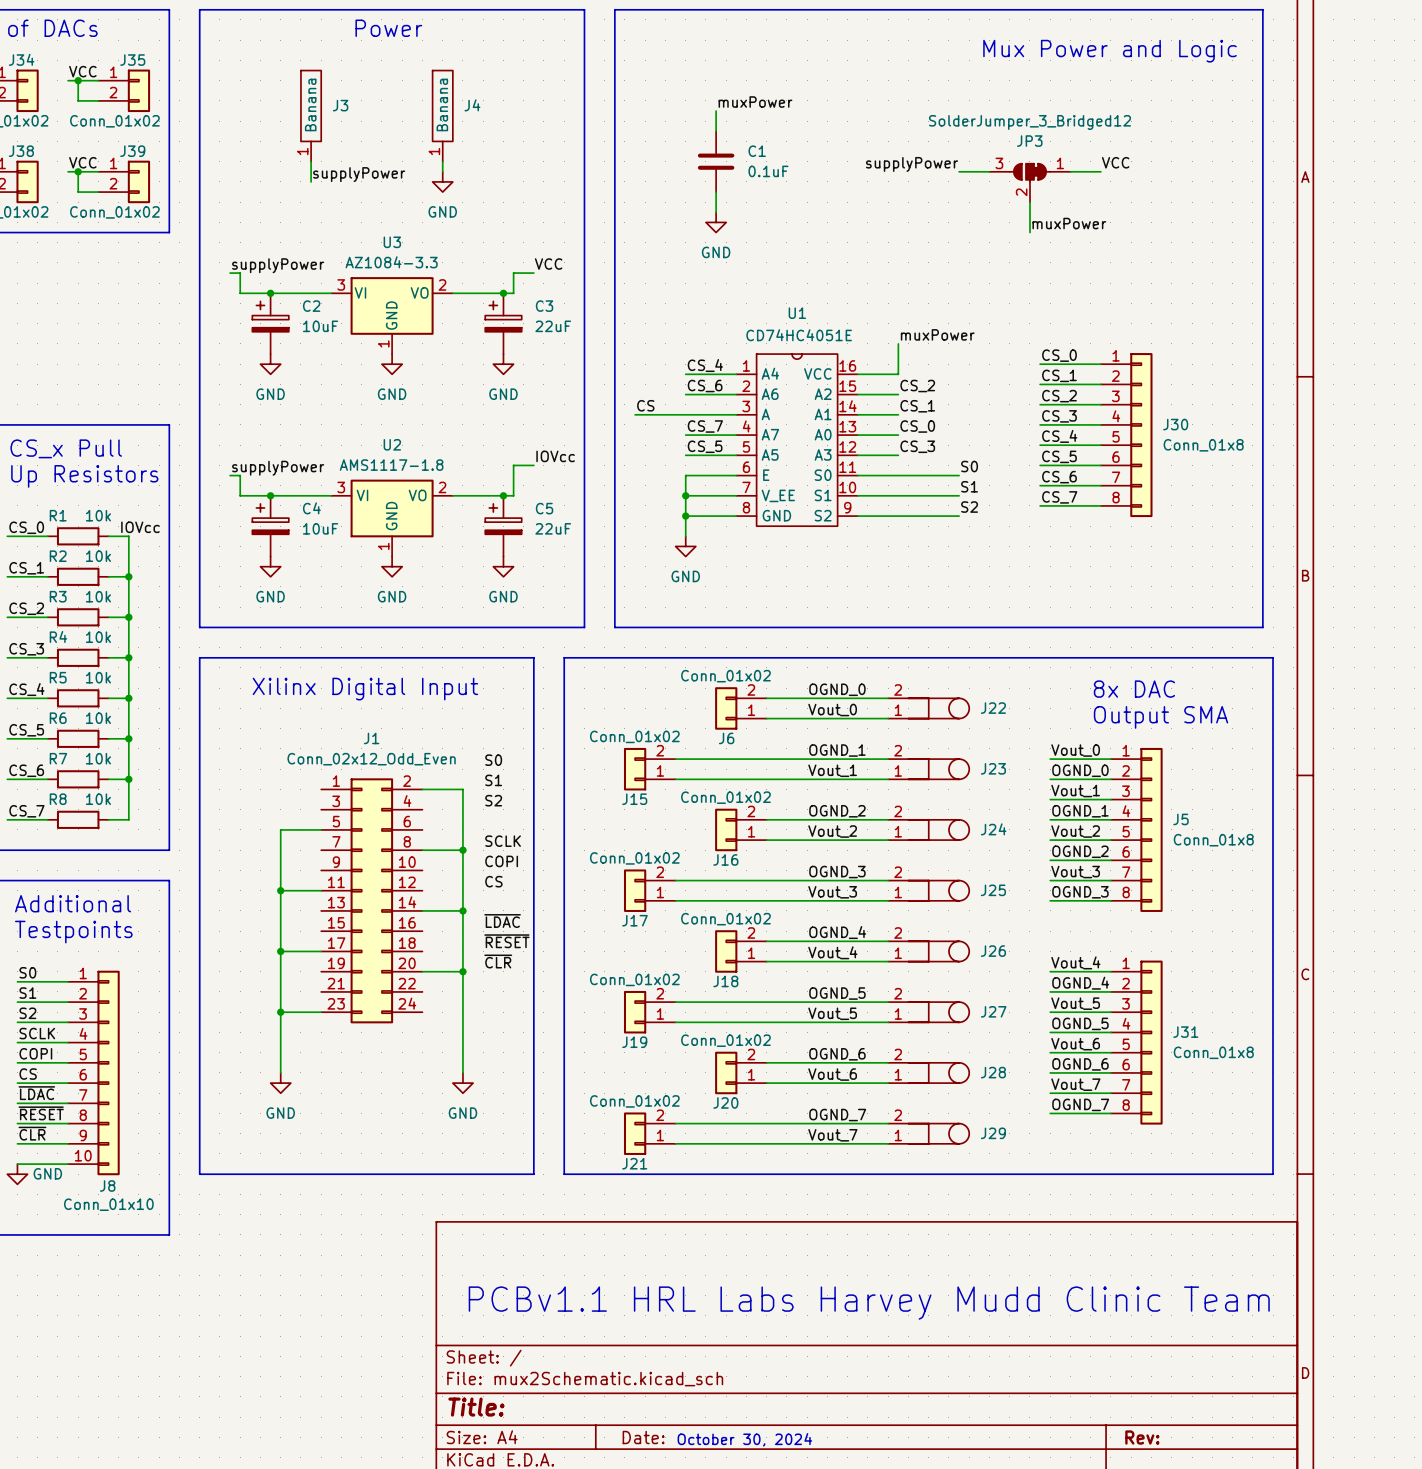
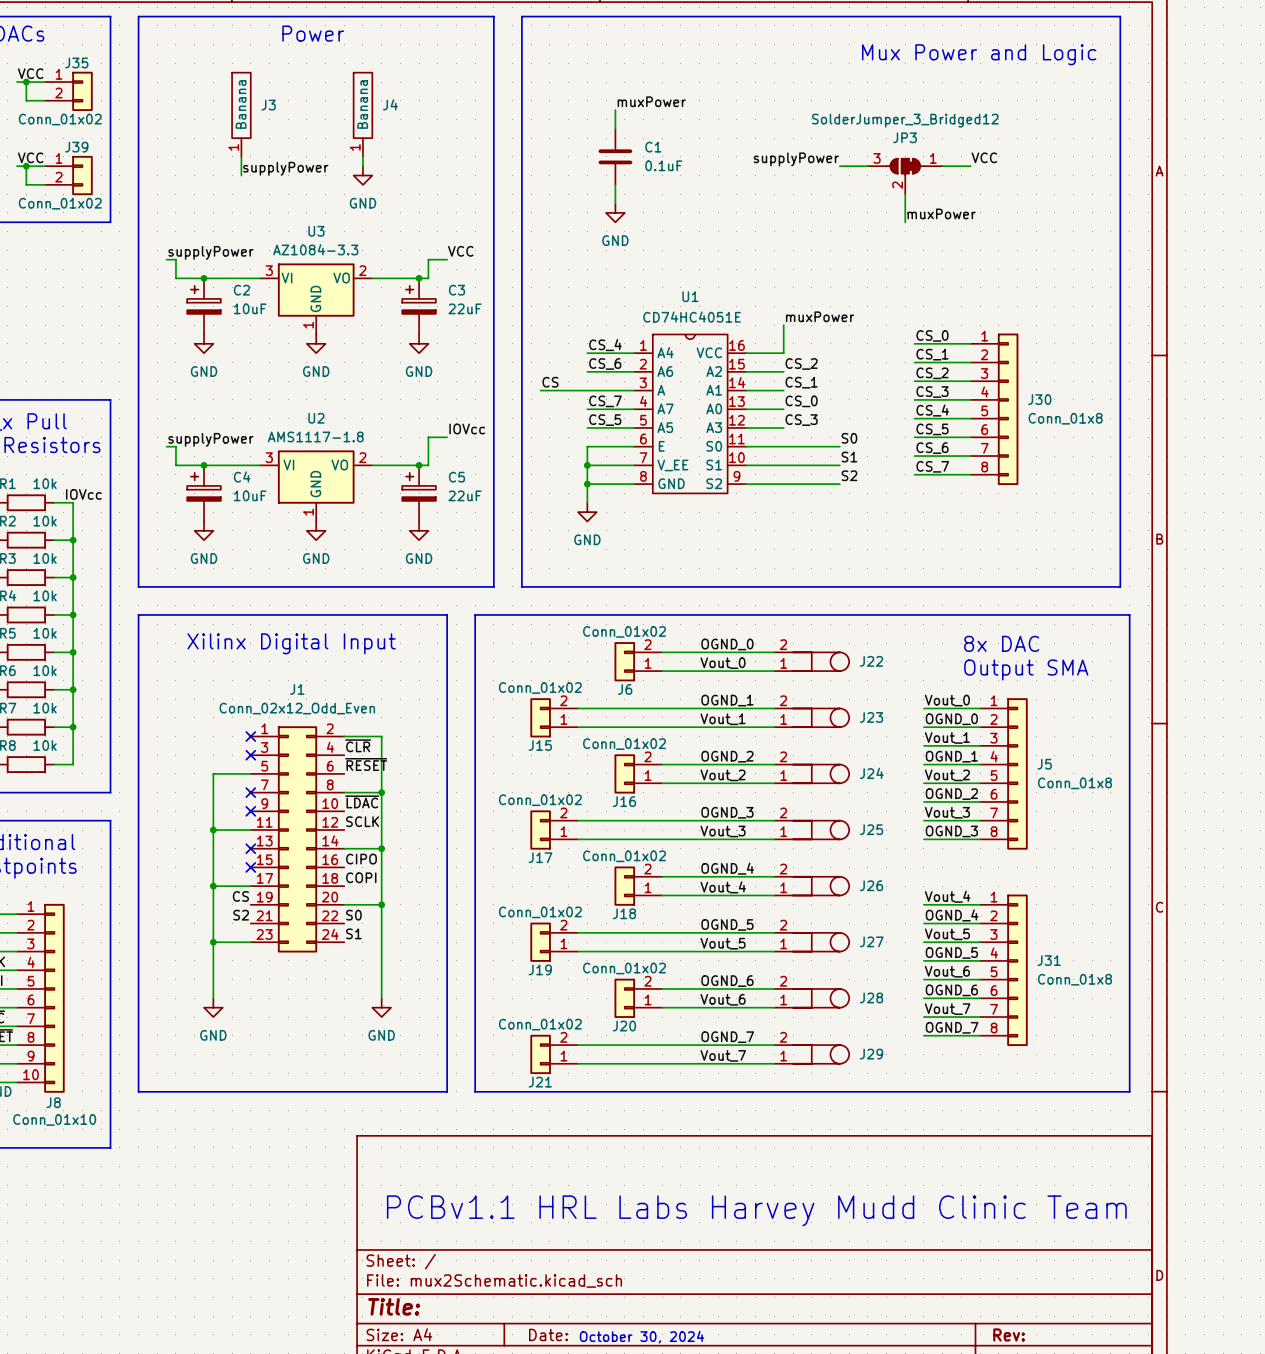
label: S0 (493, 760) -> none
label: S1 (493, 780) -> none
no-connect mark: none -> (250, 736)
label: S2 (493, 800) -> none
no-connect mark: none -> (250, 755)
label position: SCLK (503, 841) -> SCLK (362, 821)
no-connect mark: none -> (250, 792)
label position: COPI (501, 861) -> COPI (361, 877)
no-connect mark: none -> (250, 811)
label position: CS (493, 881) -> CS (240, 896)
no-connect mark: none -> (250, 848)
label position: ~{LDAC} (502, 921) -> ~{LDAC} (362, 801)
label: none -> CIPO (361, 859)
no-connect mark: none -> (250, 867)
label position: ~{RESET} (506, 941) -> ~{RESET} (366, 764)
label position: ~{CLR} (498, 961) -> ~{CLR} (358, 745)
label: none -> S2 (241, 915)
label: none -> S0 (353, 915)
label: none -> S1 (353, 933)

